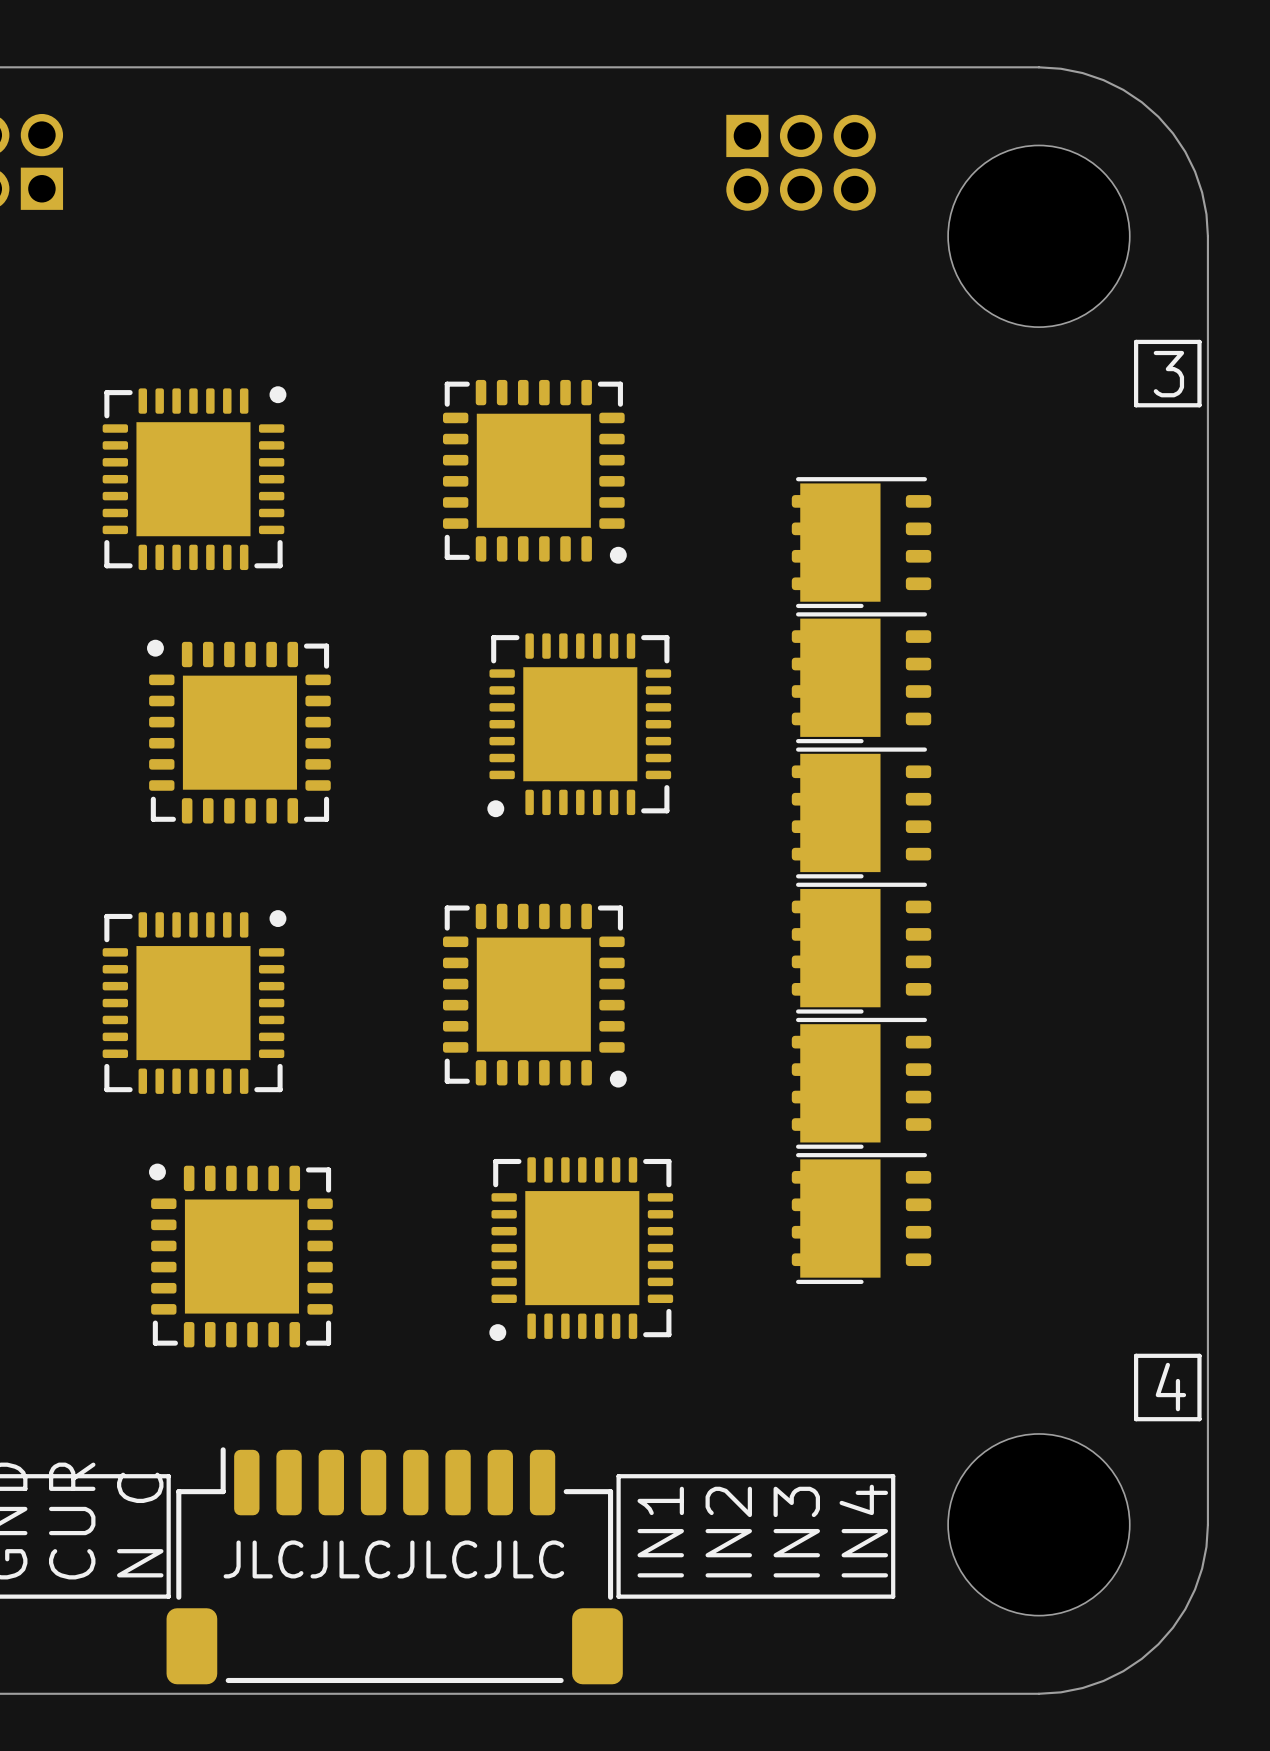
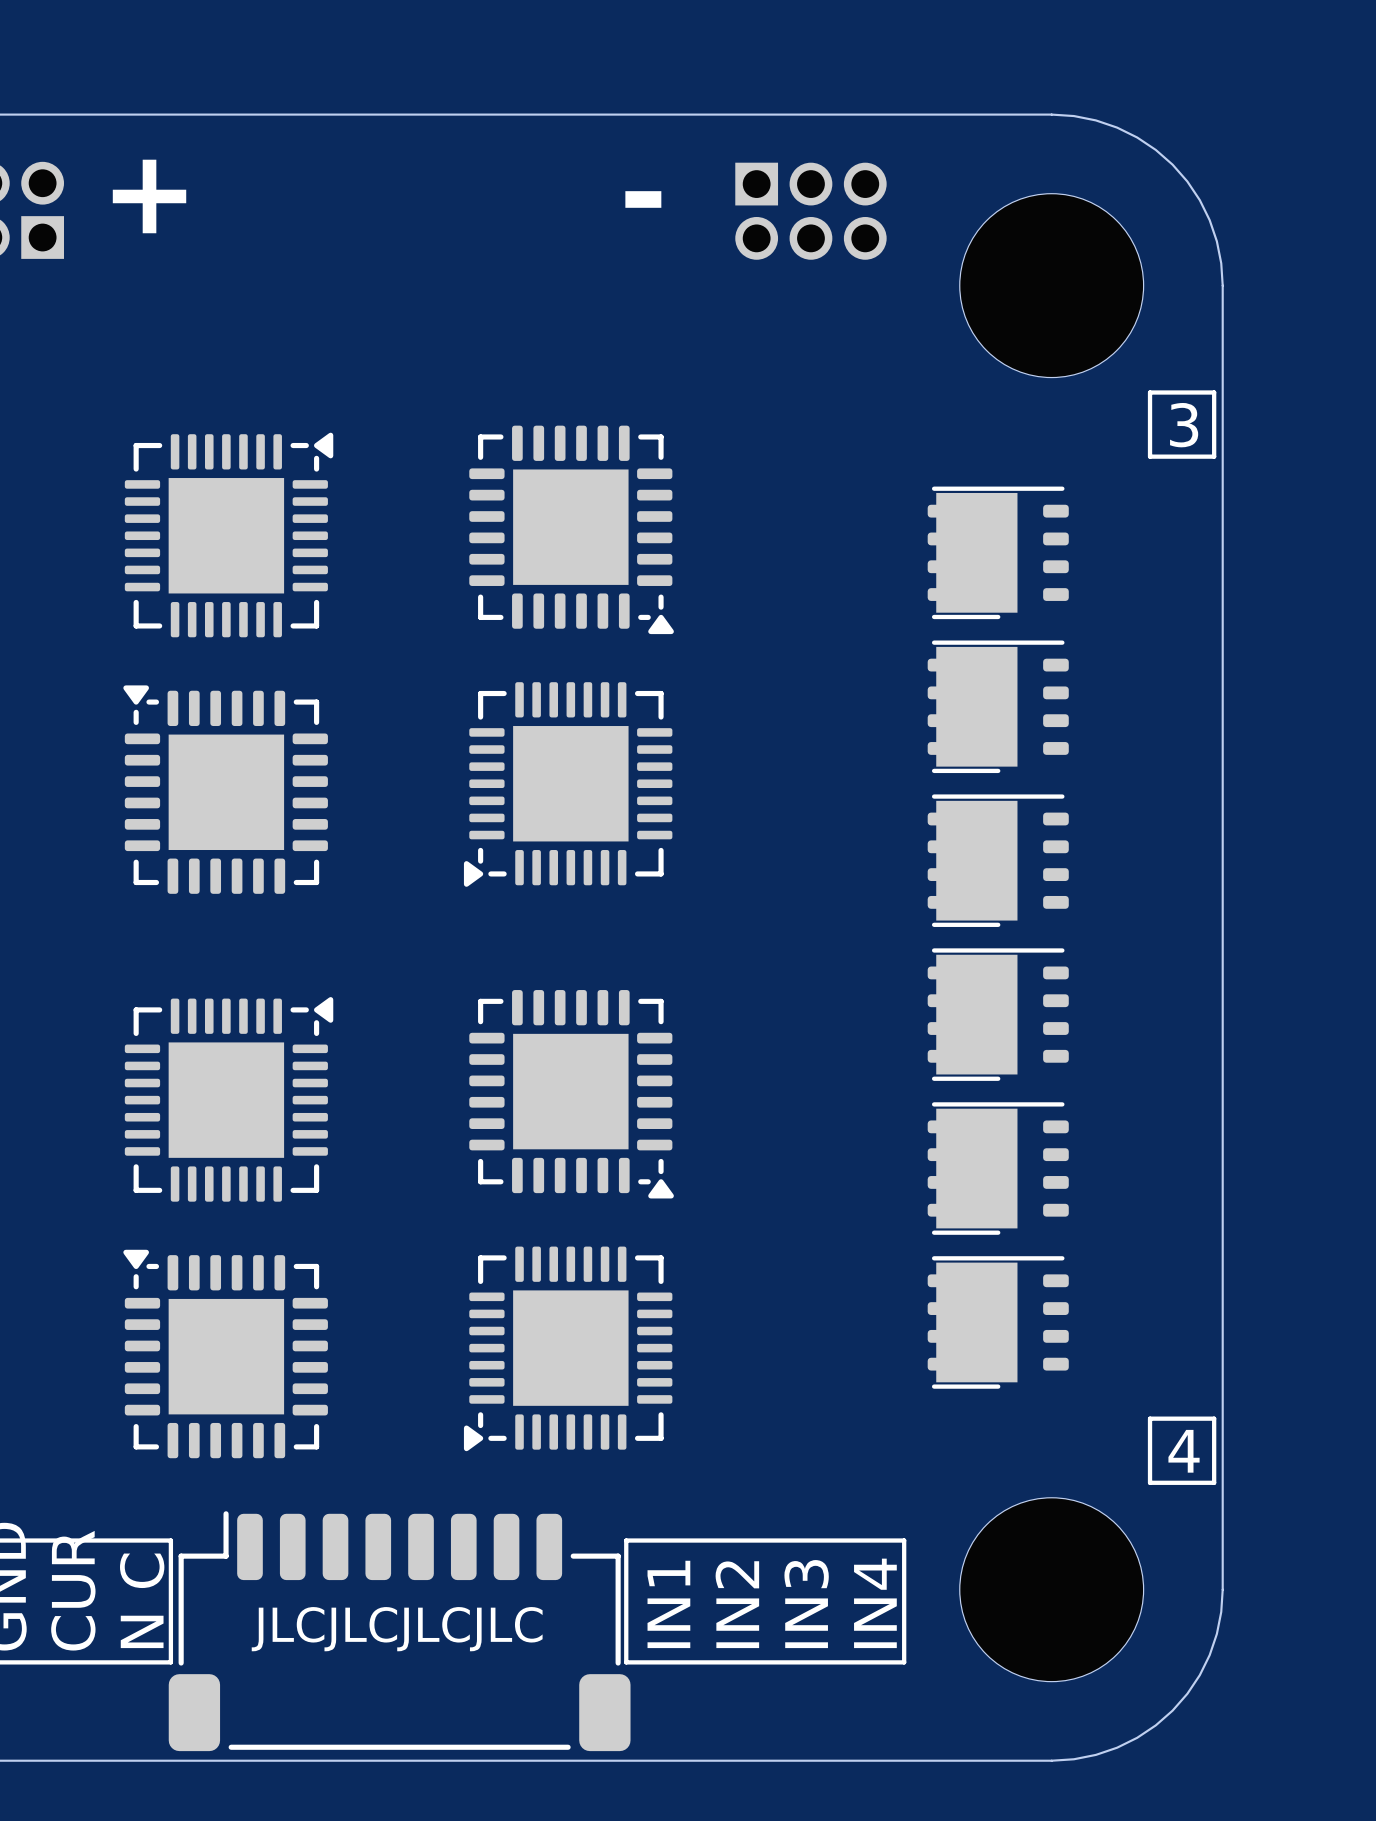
text: none -> + (149, 196)
text: none -> - (643, 199)
part footprint: [443, 379, 627, 564] -> [469, 425, 674, 635]
part footprint: [102, 386, 287, 571] -> [124, 432, 334, 638]
part: none -> (998, 552)
part: (861, 542) -> none
part footprint: [487, 633, 672, 818] -> [463, 682, 673, 887]
part footprint: [147, 639, 331, 824] -> [123, 685, 328, 894]
part: none -> (998, 706)
part: (861, 677) -> none
part: none -> (998, 860)
part: (861, 812) -> none
part: (861, 948) -> none
part: none -> (998, 1014)
part: (534, 995) -> none
part: (194, 1002) -> none
part: none -> (571, 1094)
part: none -> (229, 1099)
part: (861, 1083) -> none
part: none -> (998, 1168)
part footprint: [149, 1163, 333, 1348] -> [123, 1249, 328, 1459]
part: (861, 1218) -> none
part: (581, 1249) -> none
part: none -> (998, 1322)
part: none -> (568, 1348)

